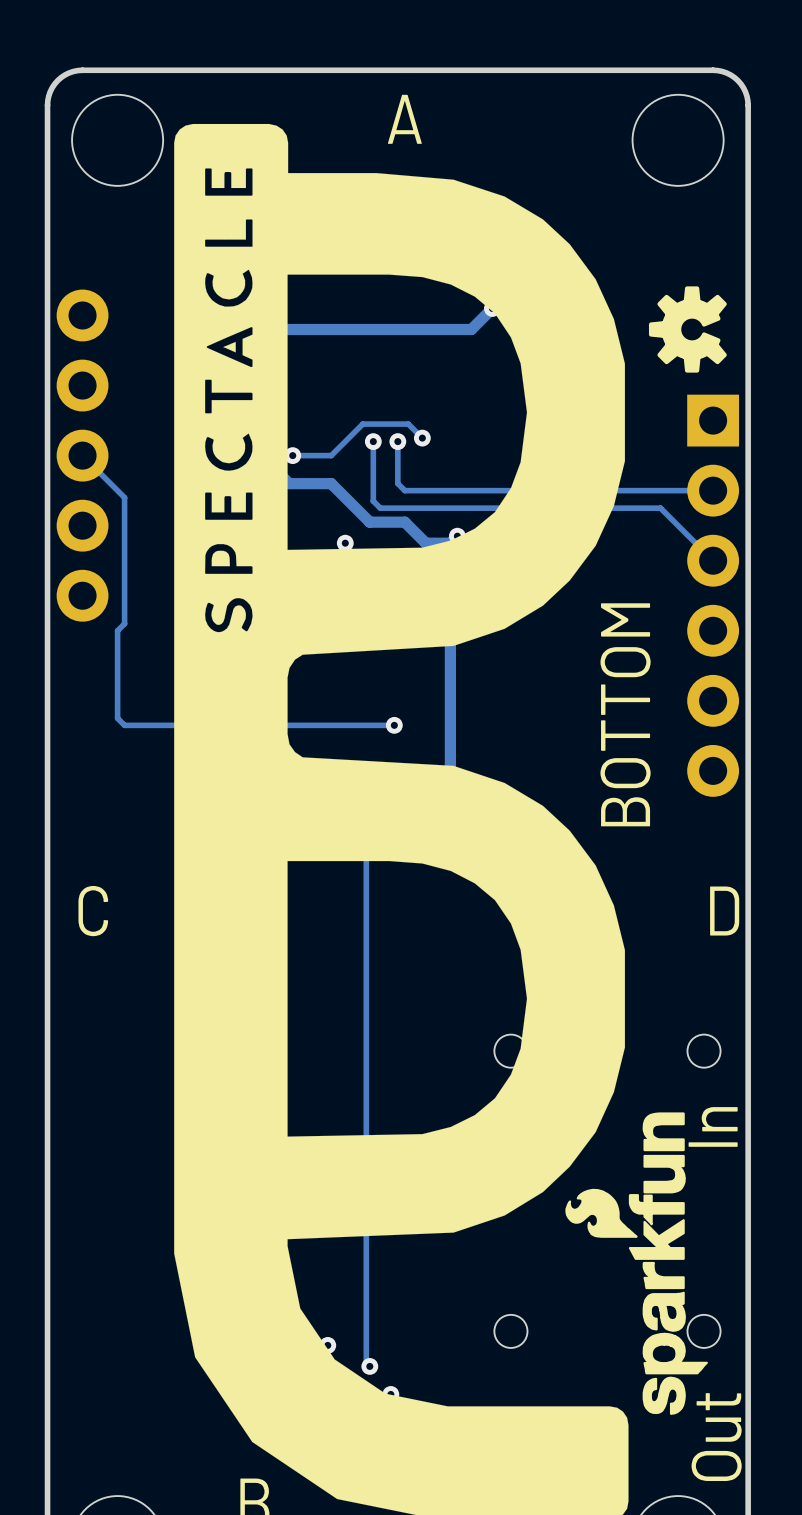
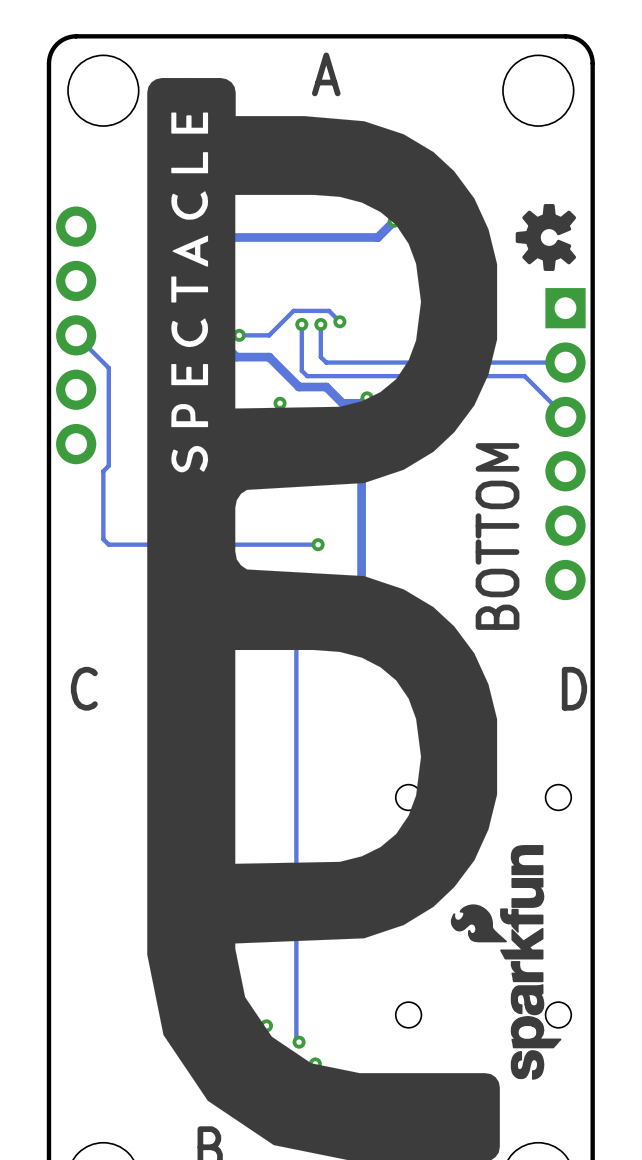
text: In (713, 1126) -> none
text: Out (716, 1437) -> none

